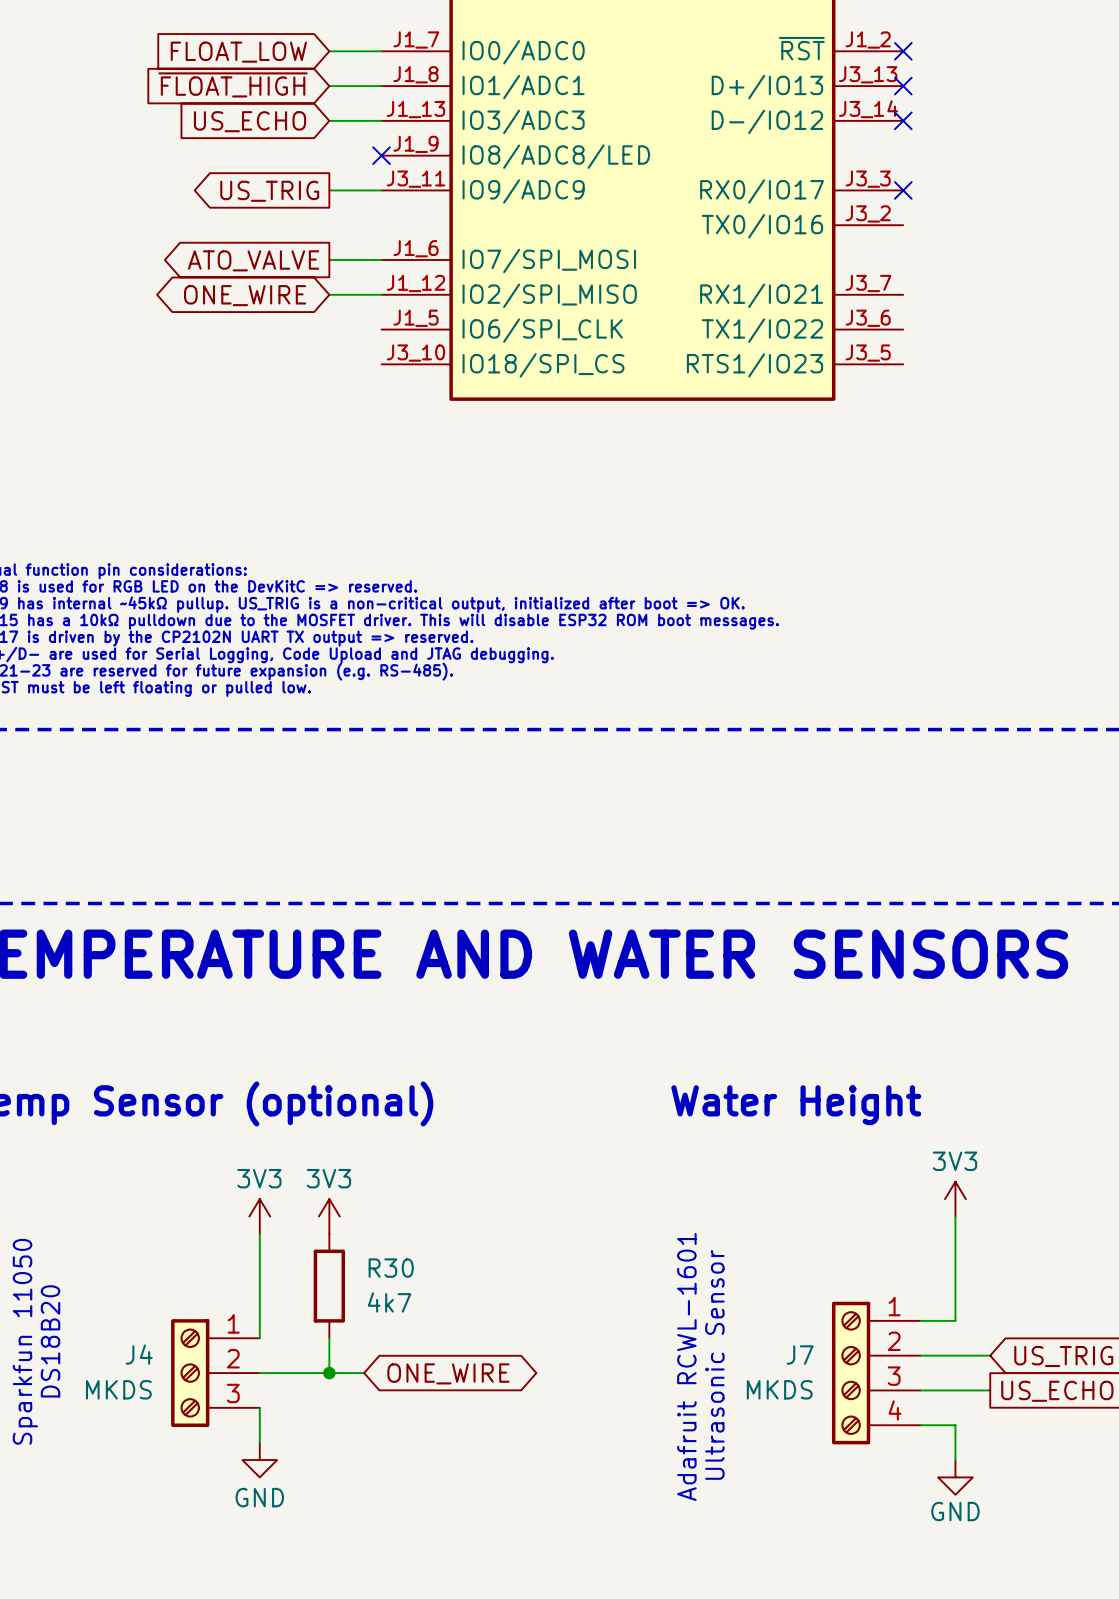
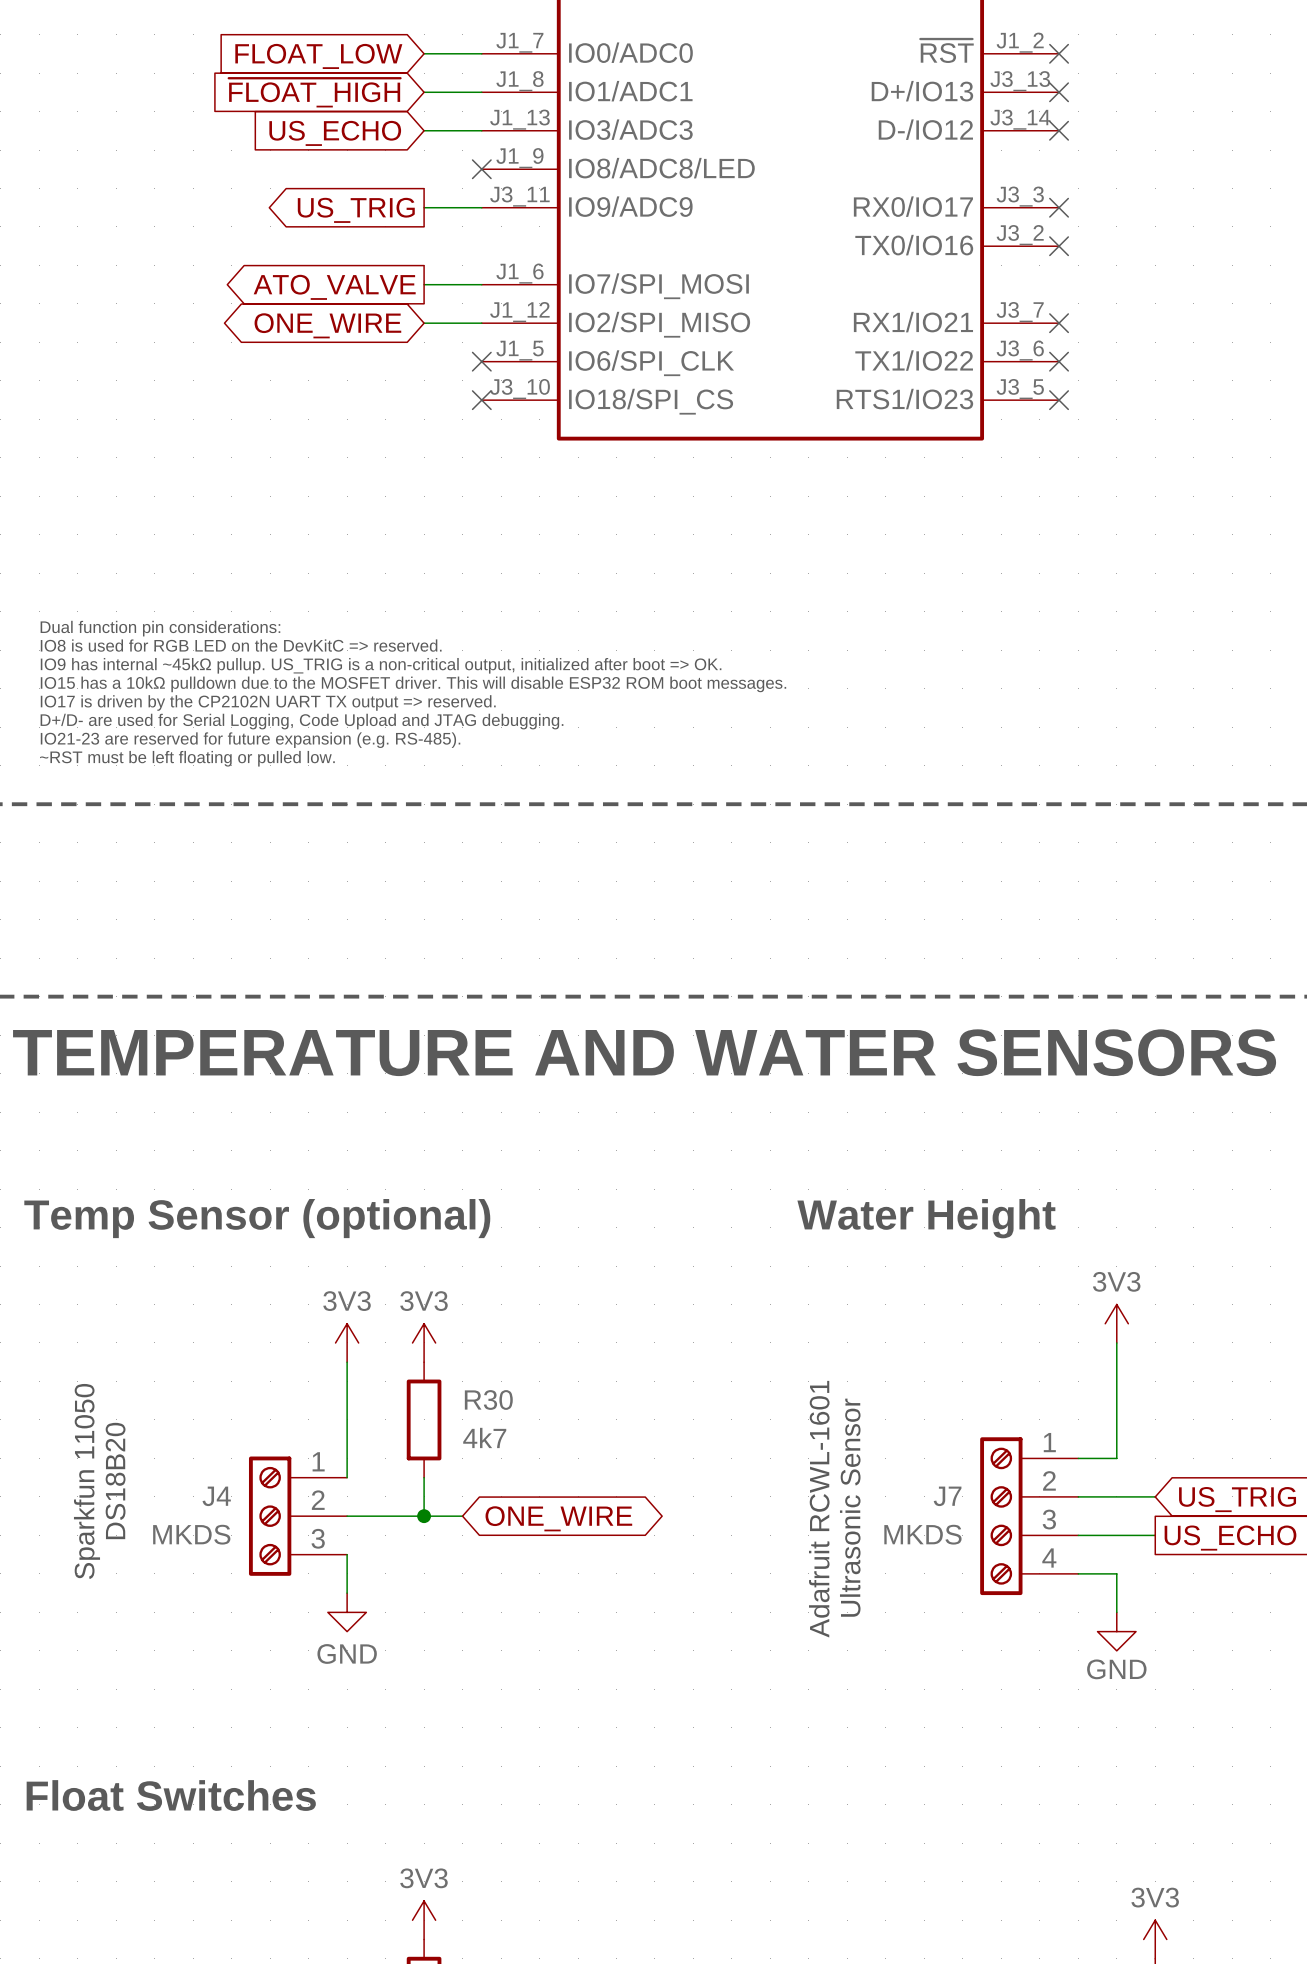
no-connect mark: none -> (1059, 246)
no-connect mark: none -> (1059, 323)
no-connect mark: none -> (481, 361)
no-connect mark: none -> (1059, 361)
no-connect mark: none -> (481, 400)
no-connect mark: none -> (1059, 400)

